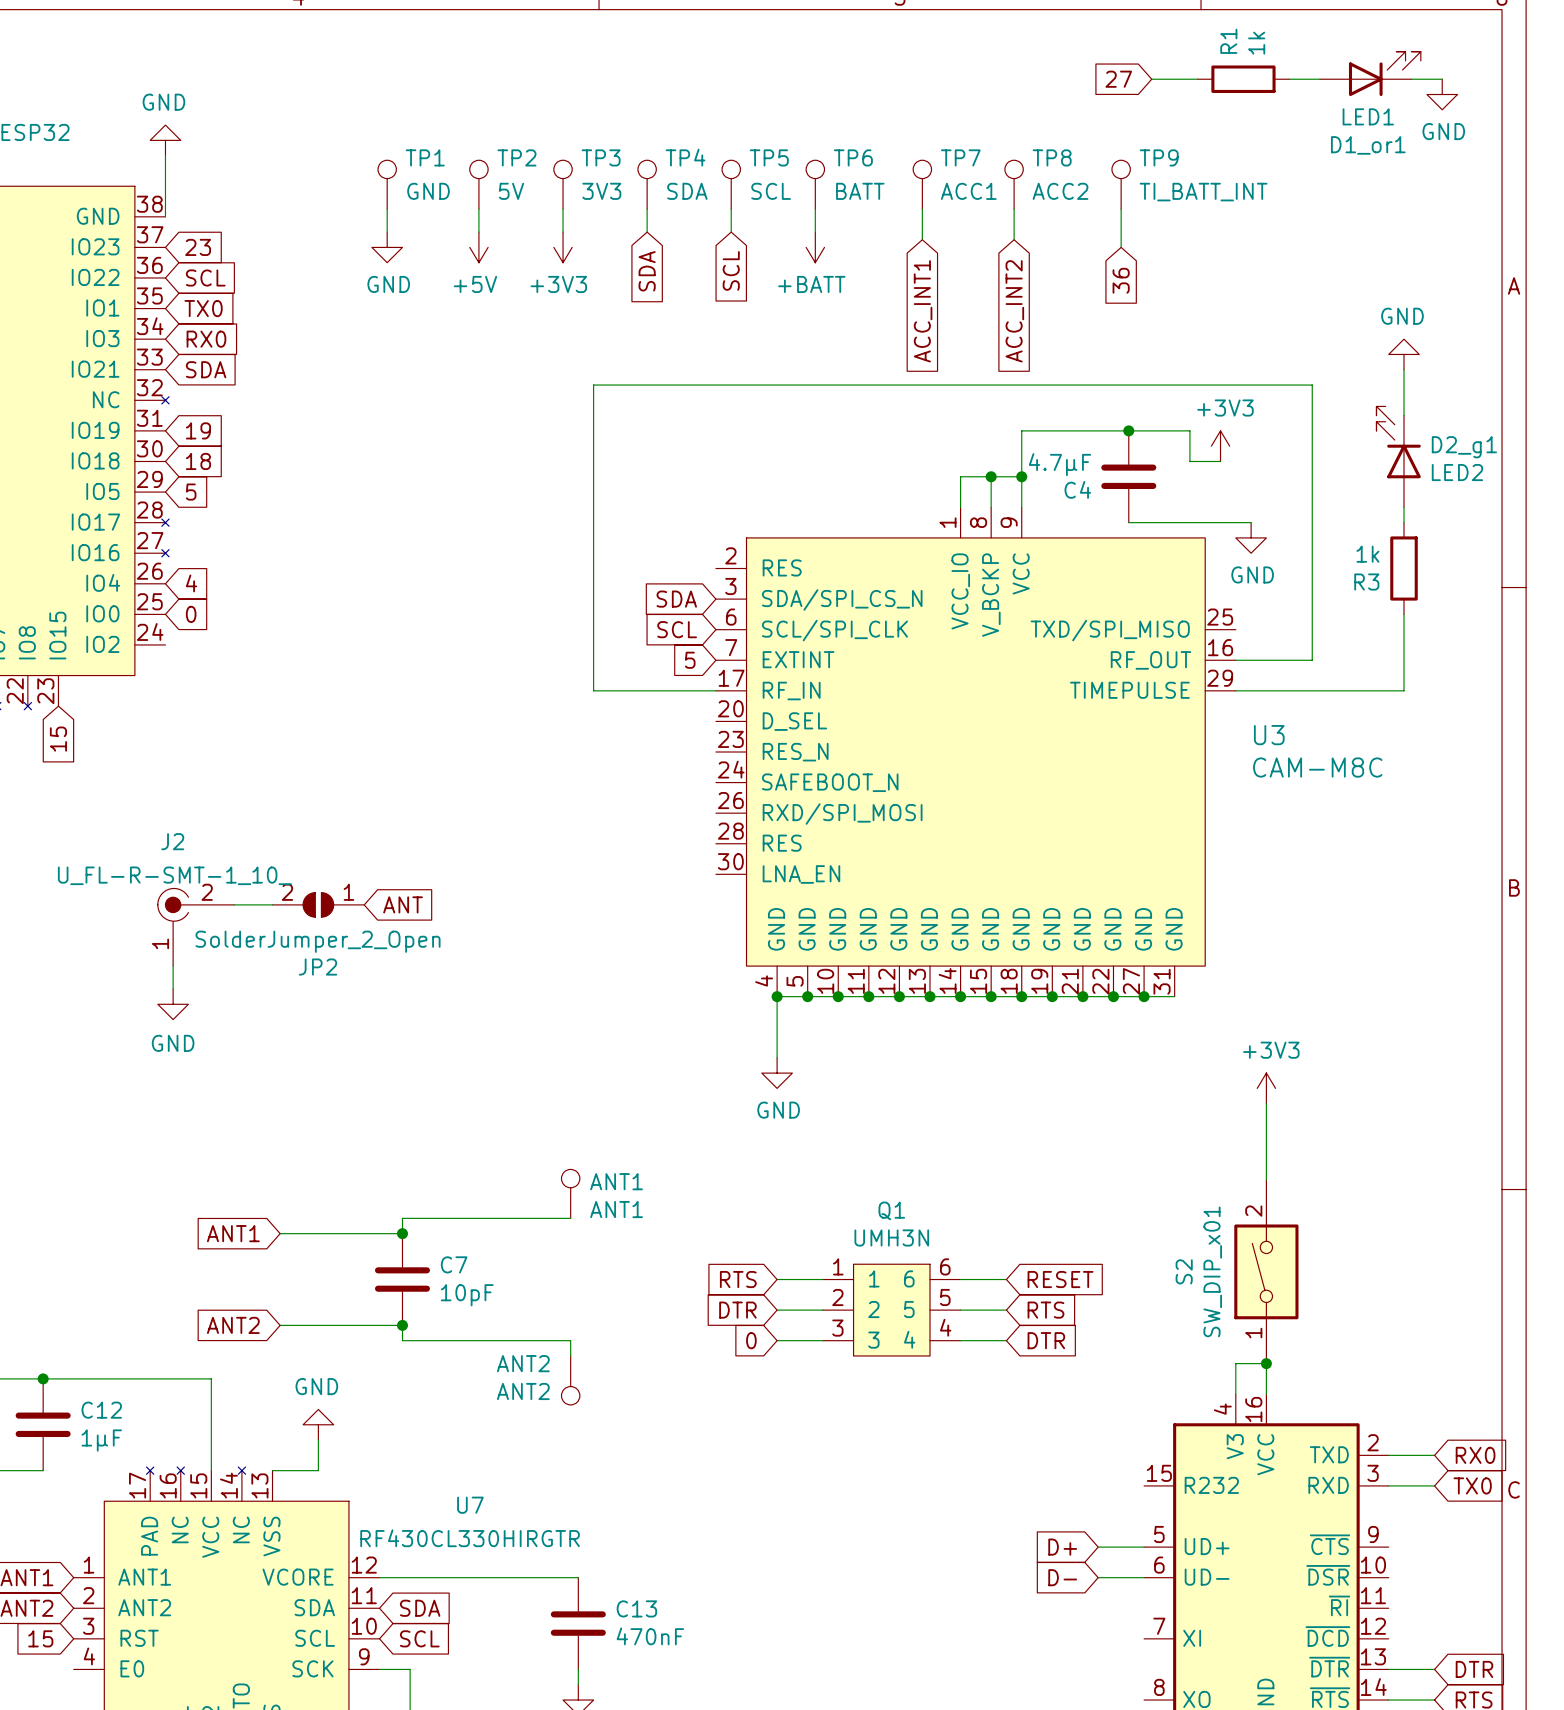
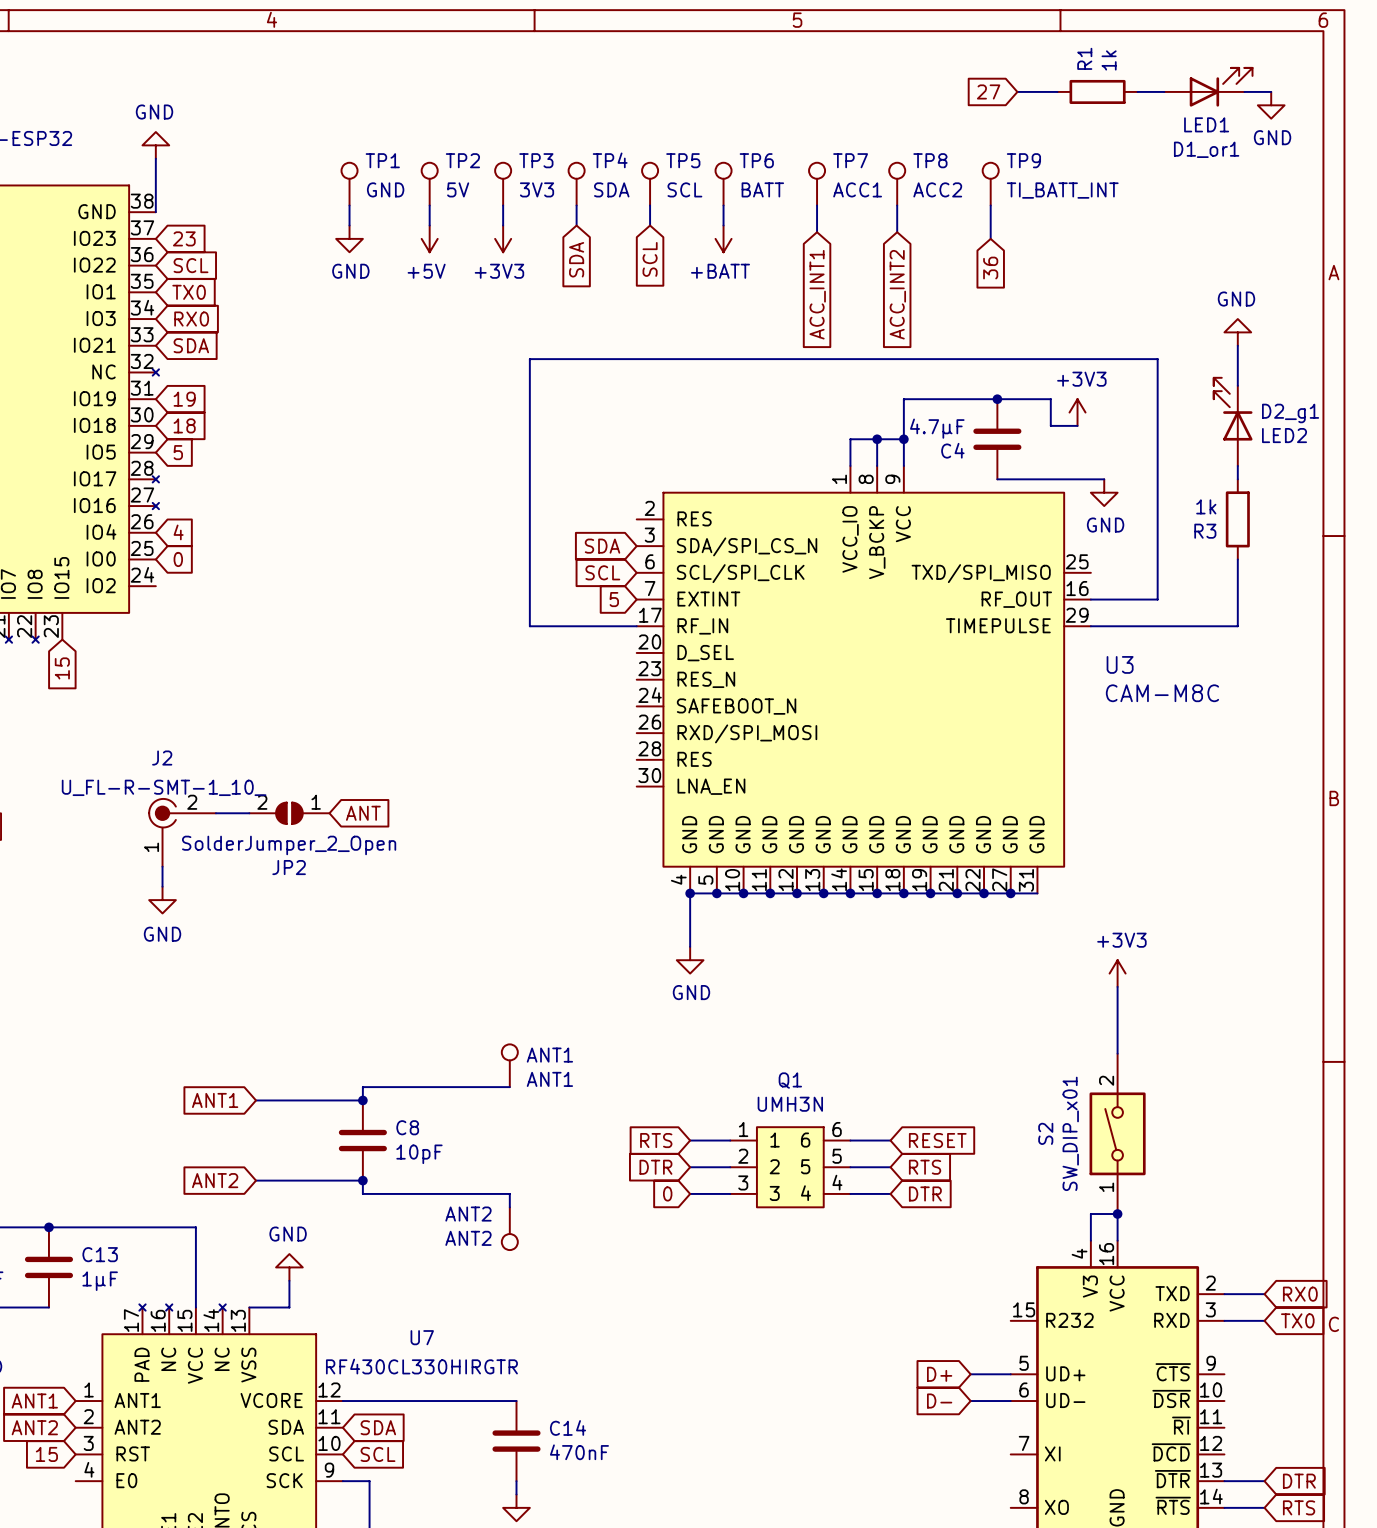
C7 name: C7 (454, 1264) -> C8 (407, 1127)
C12 name: C12 (101, 1410) -> C13 (100, 1254)
C13 name: C13 (636, 1608) -> C14 (567, 1427)

